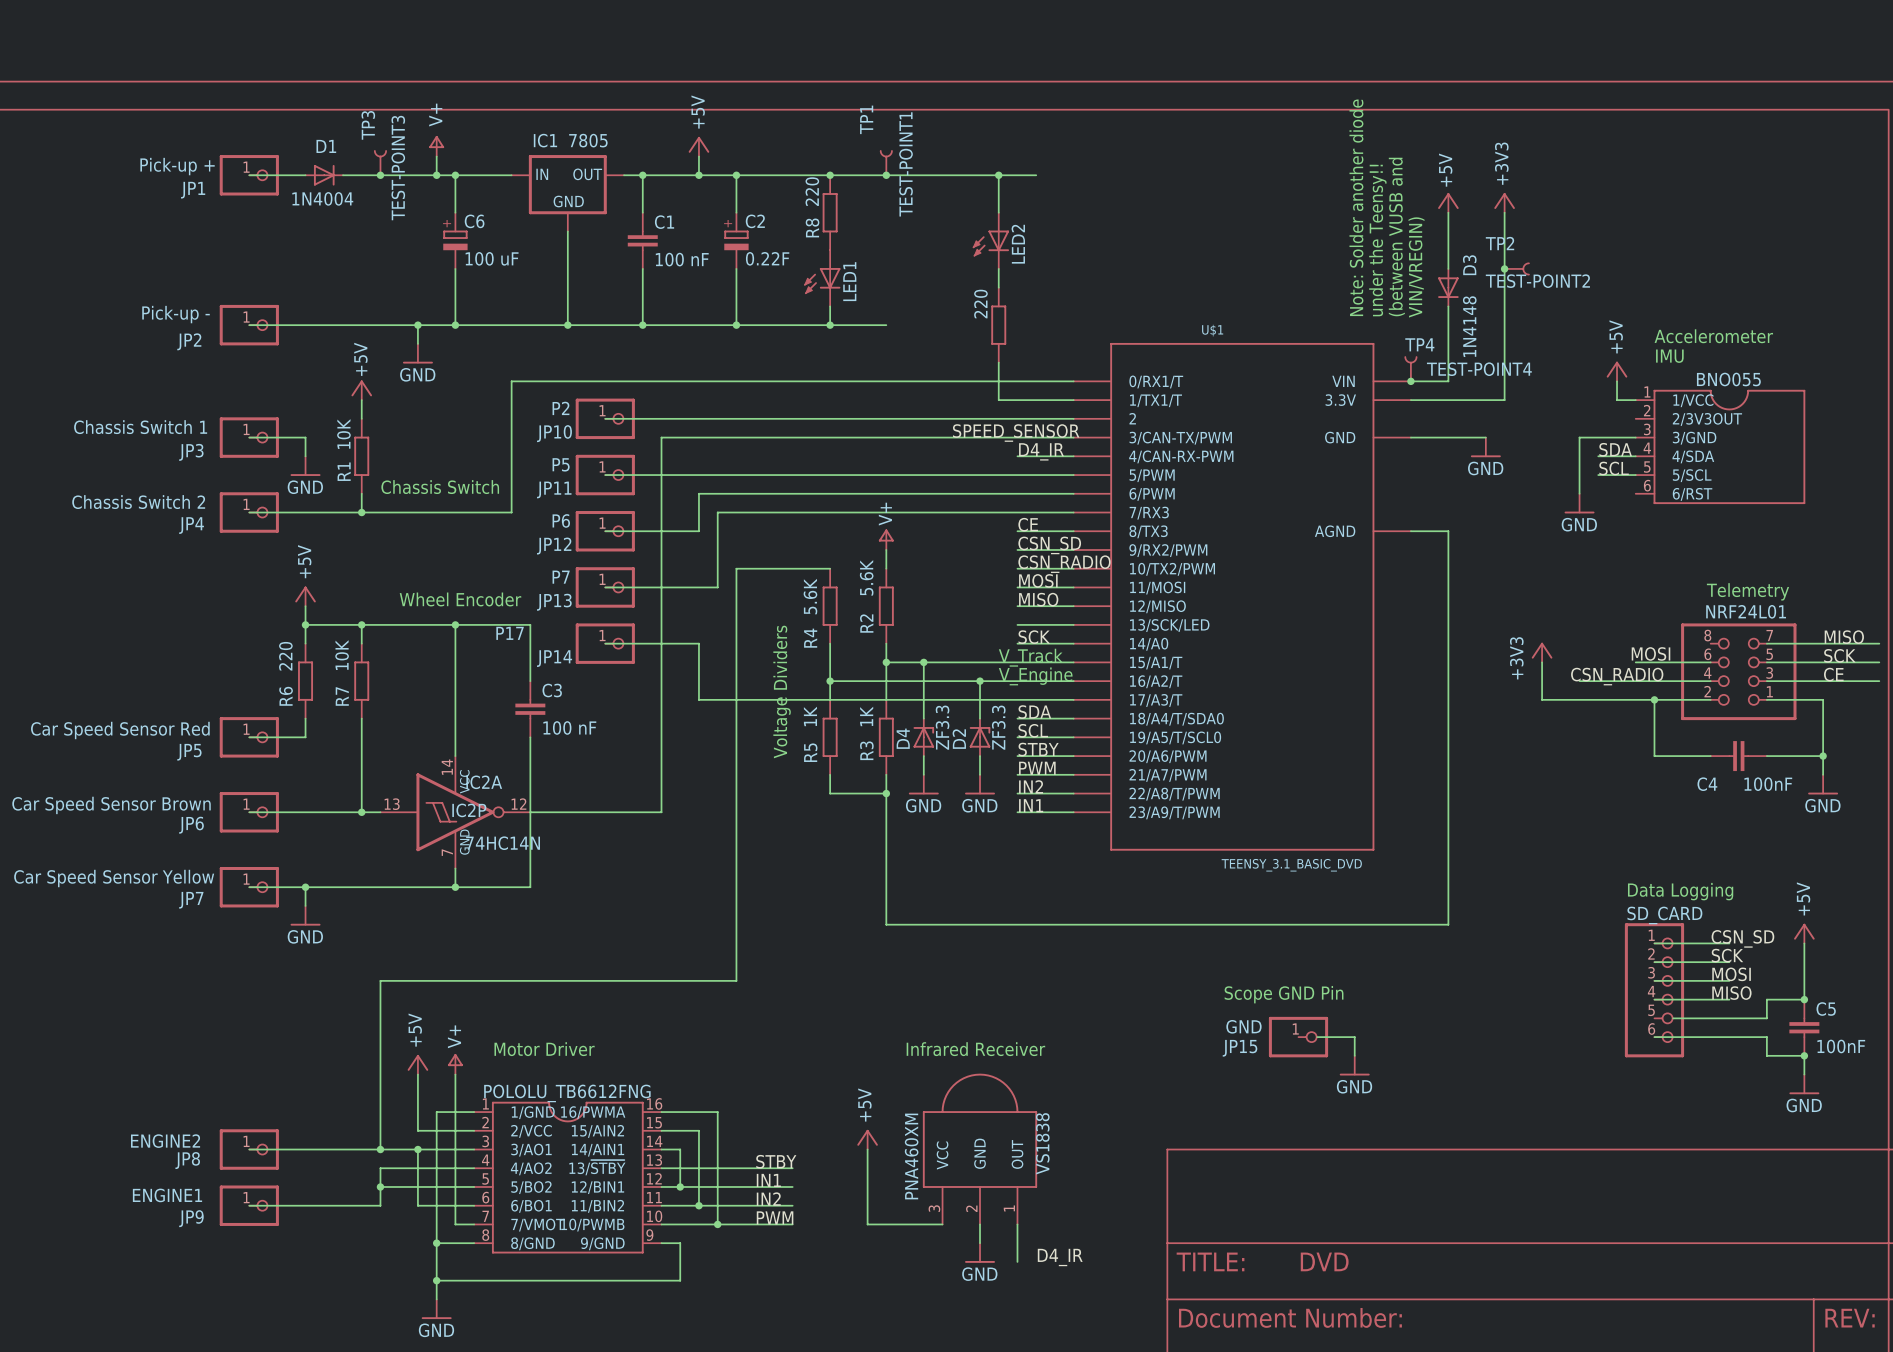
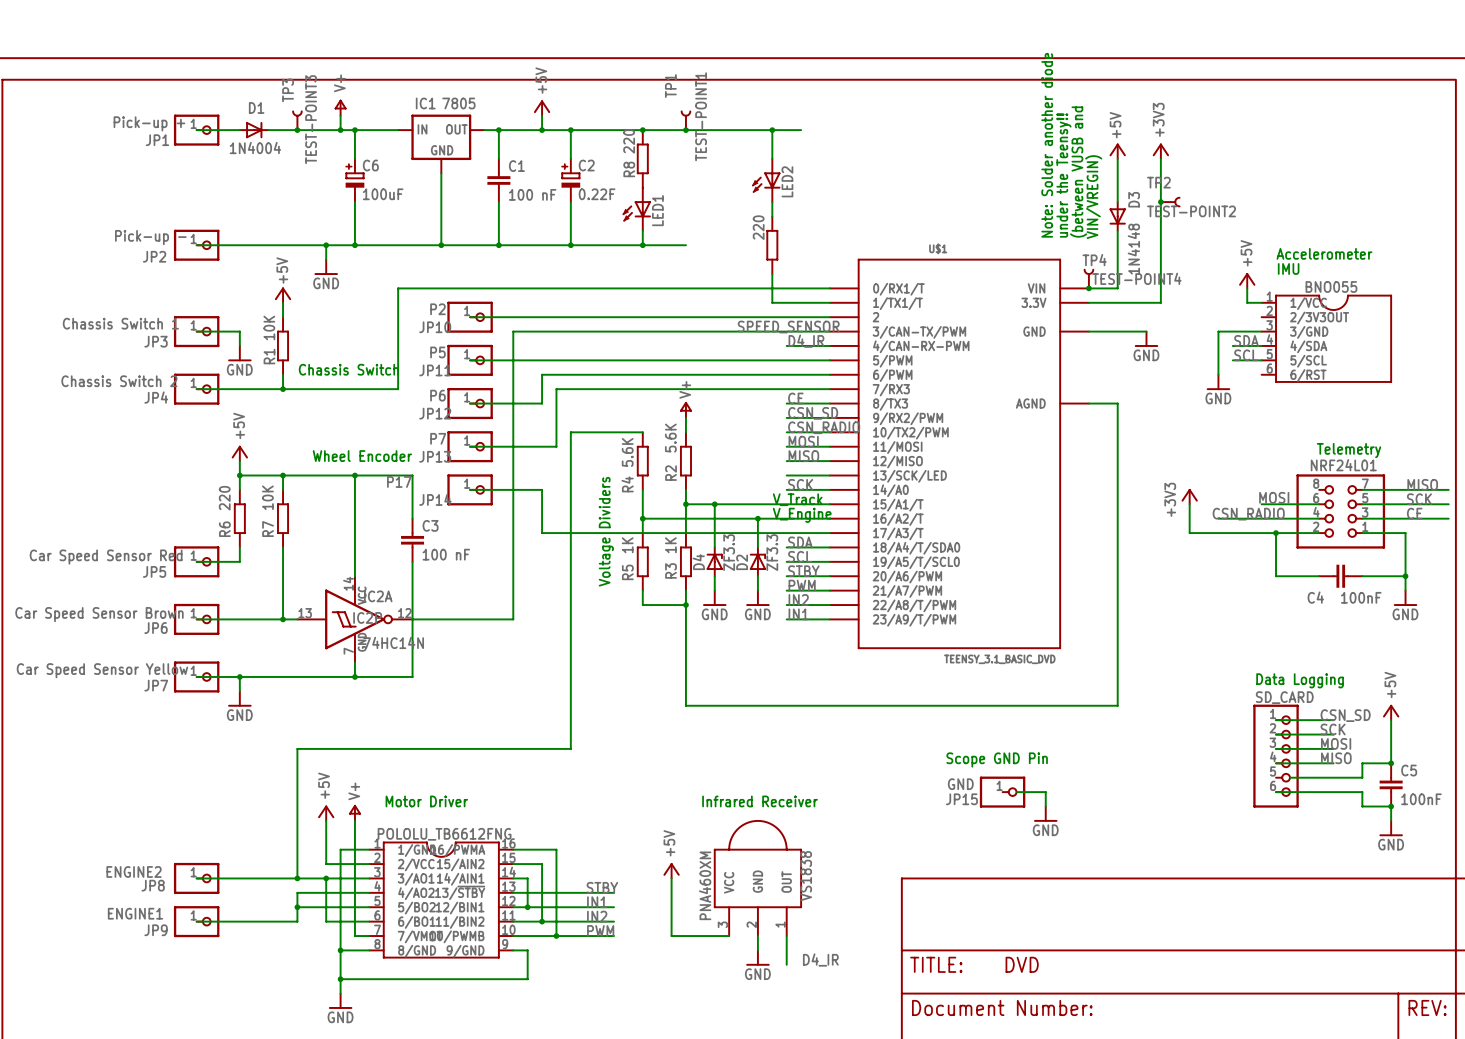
C6 value: 100 uF (492, 258) -> 100uF (383, 194)

